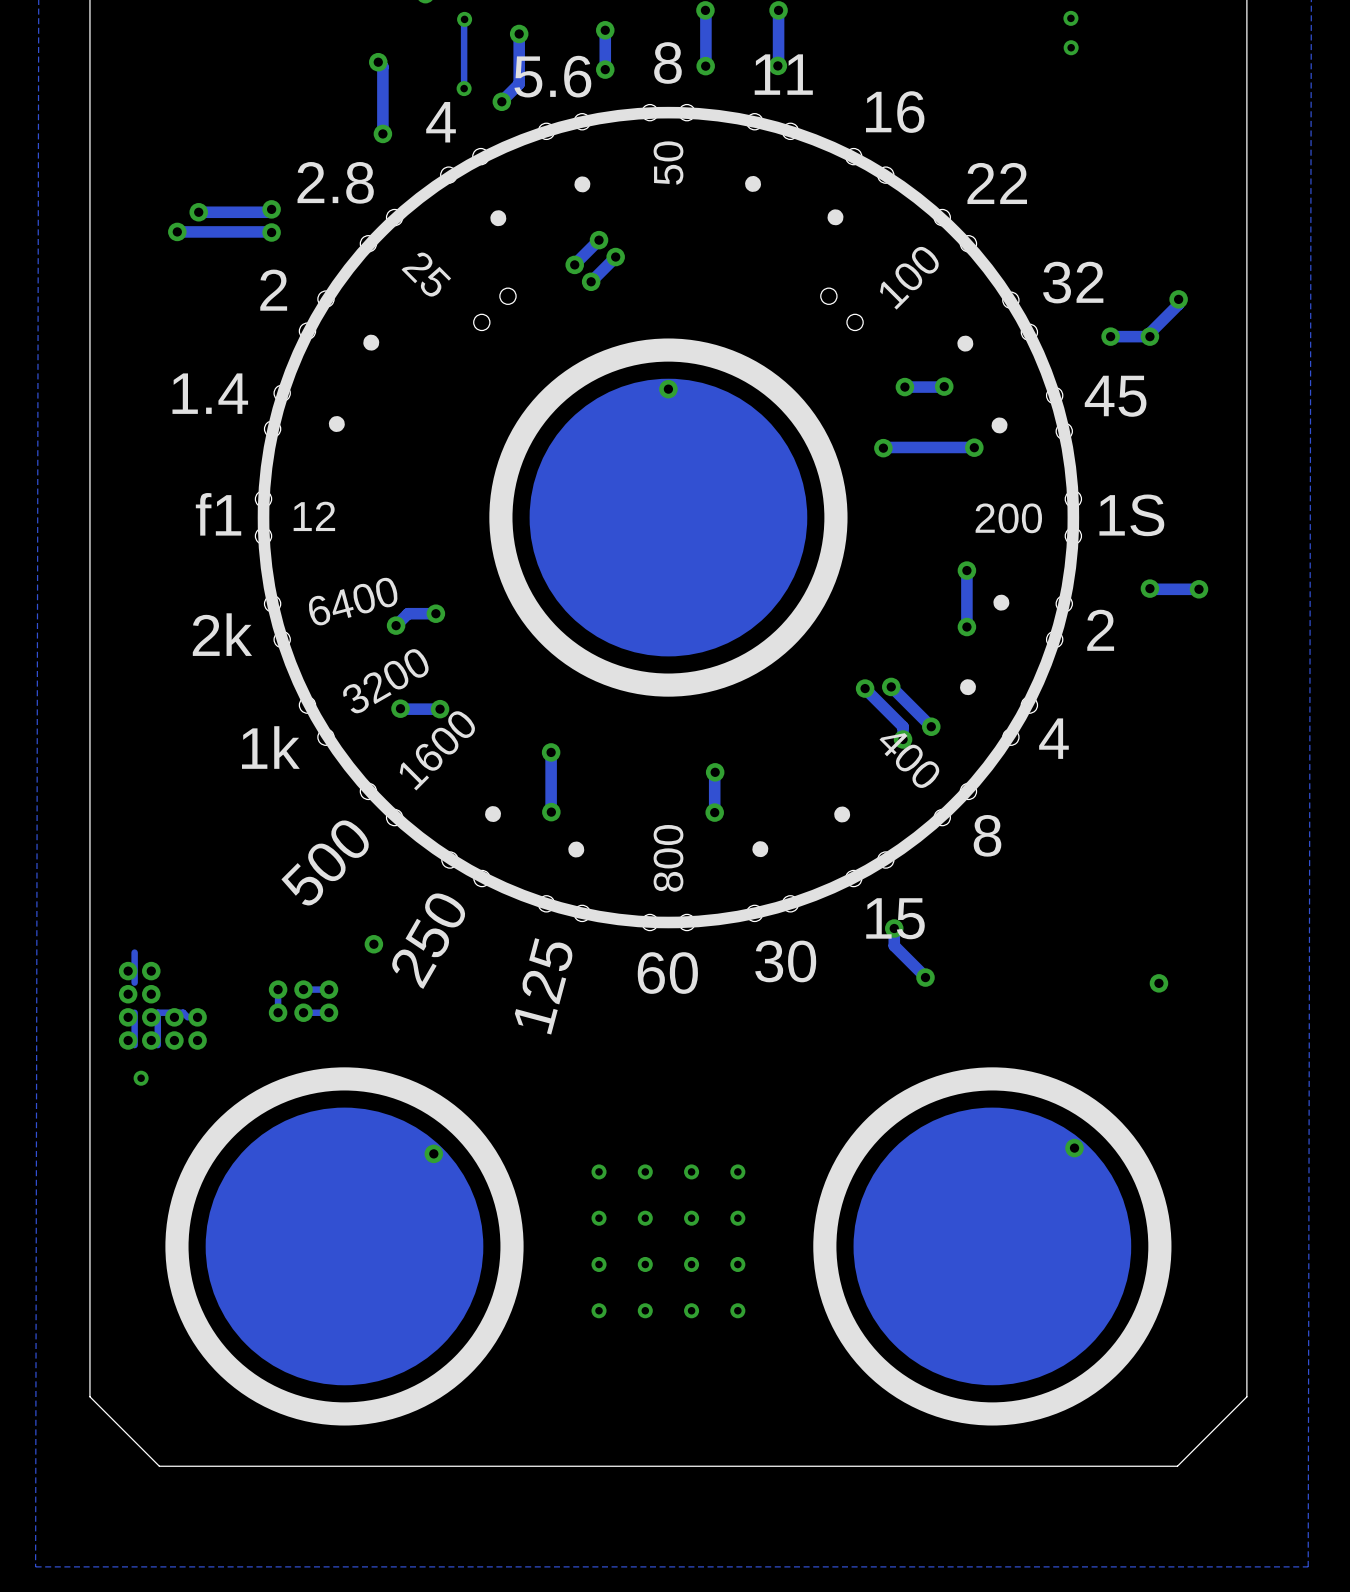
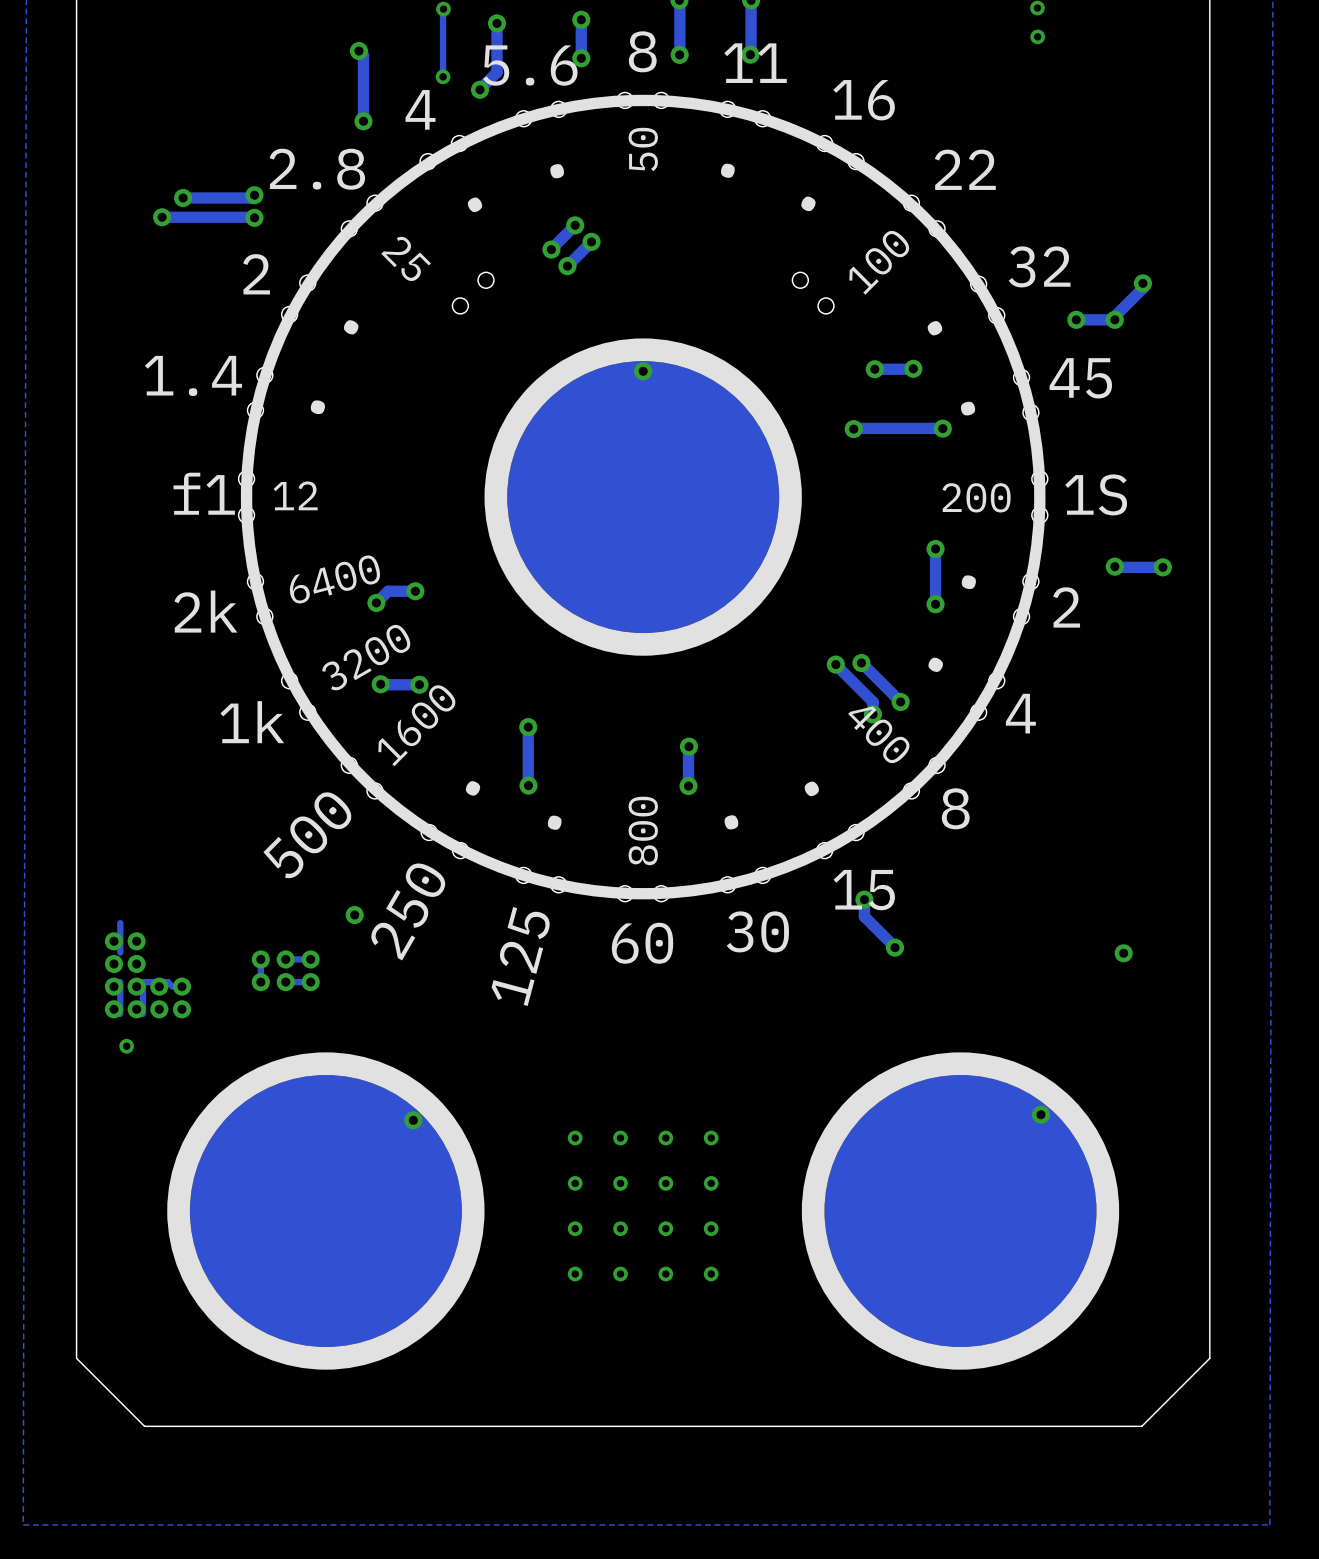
drawing shape: [489, 338, 848, 697] -> [484, 338, 802, 656]
drawing shape: [165, 1067, 524, 1426] -> [167, 1052, 485, 1370]
drawing shape: [813, 1067, 1172, 1426] -> [801, 1052, 1120, 1370]

